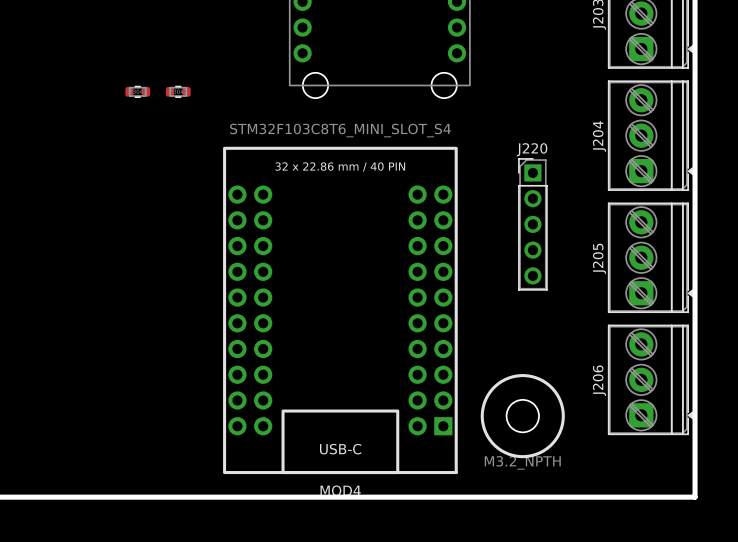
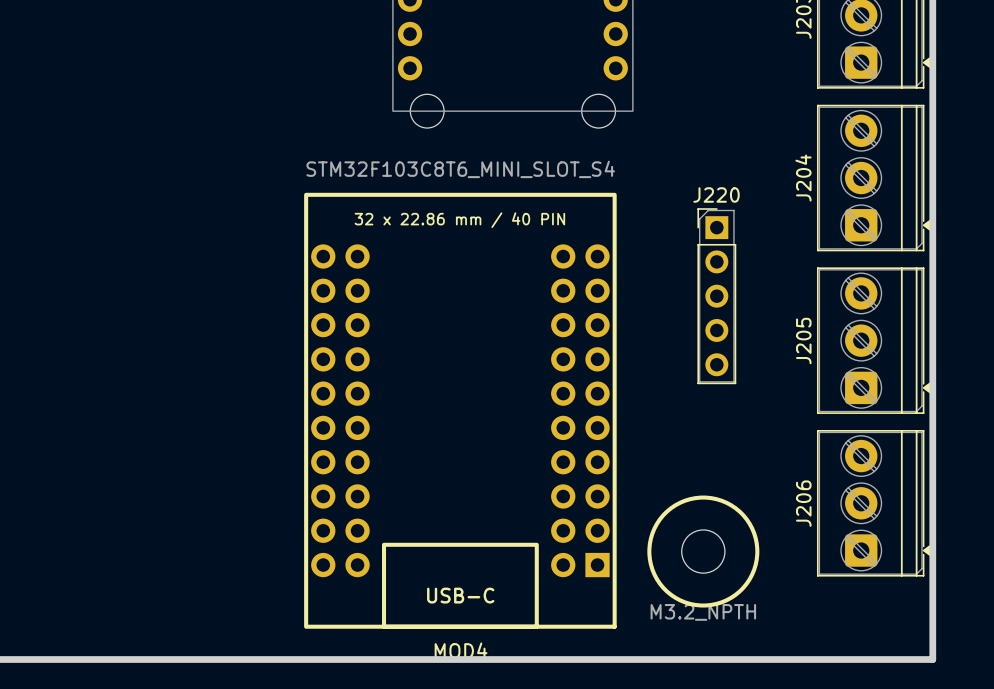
part: (137, 91) -> none
part: (178, 91) -> none

